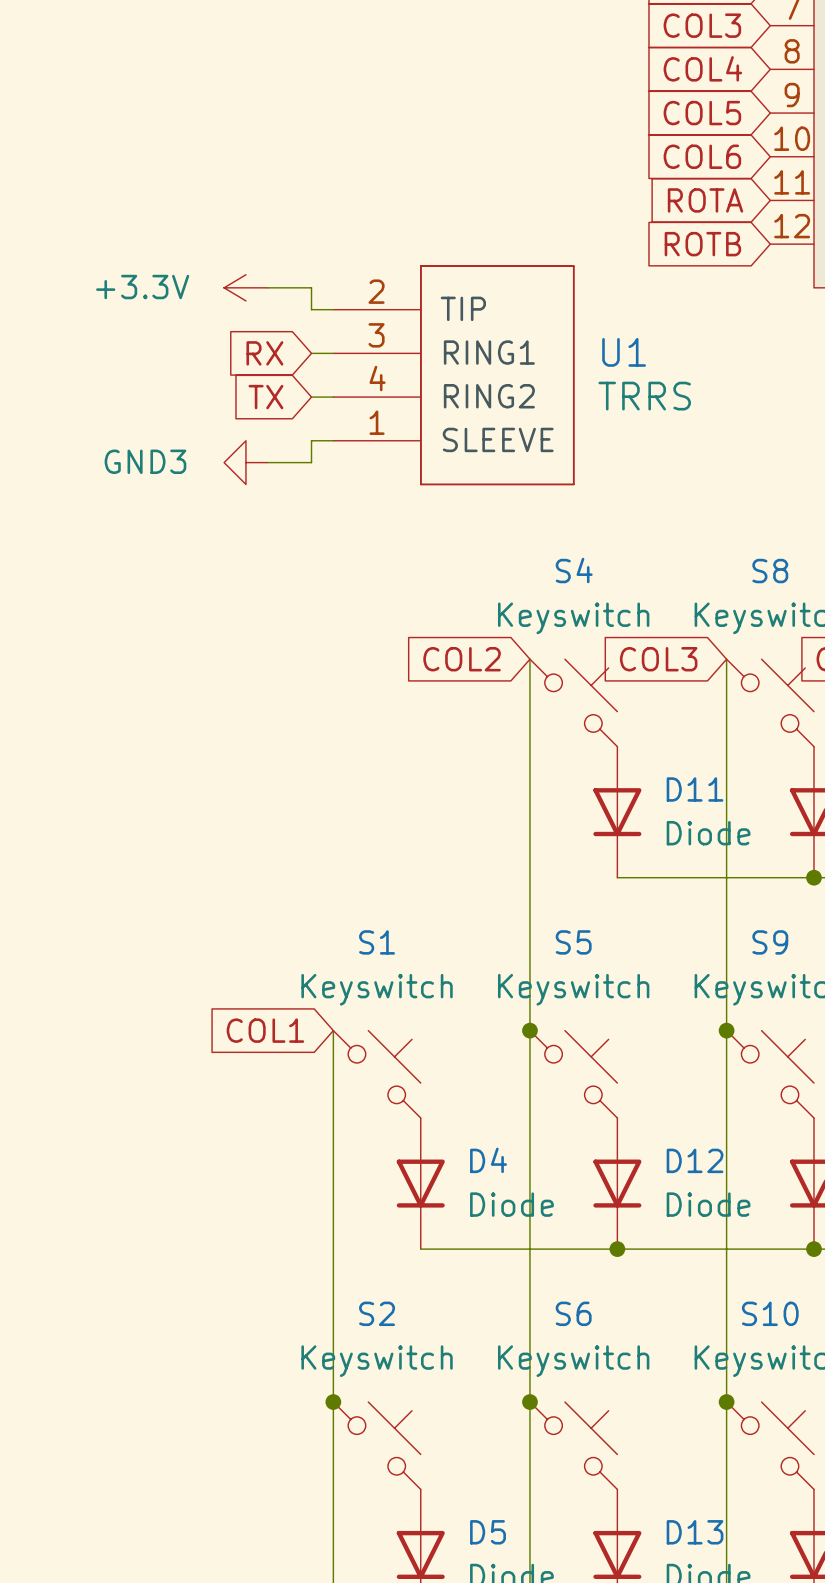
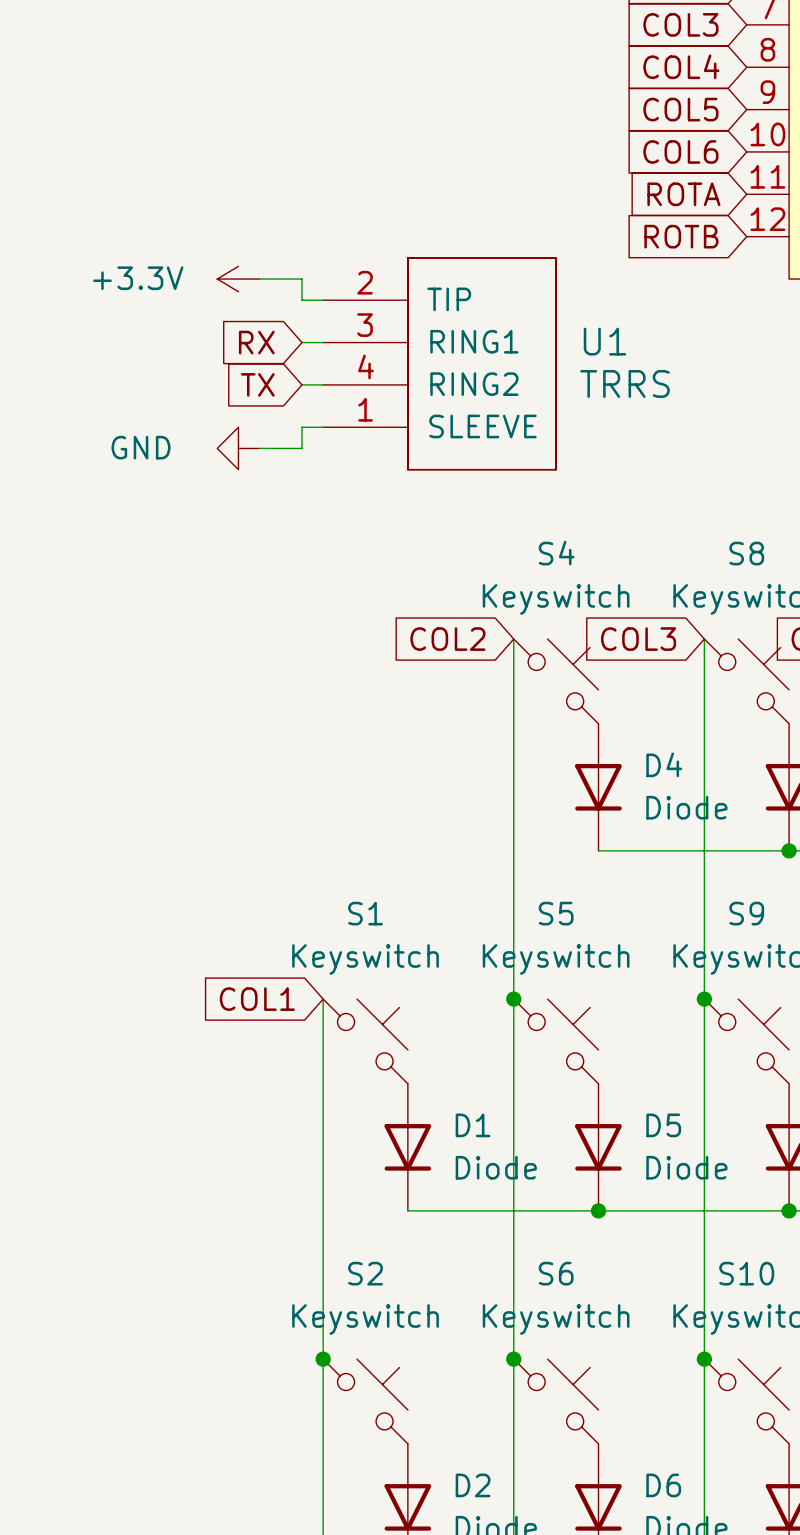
power symbol: GND3 (245, 462) -> GND (238, 448)
D11 name: D11 (695, 789) -> D4 (664, 764)
D4 name: D4 (488, 1160) -> D1 (473, 1125)
D12 name: D12 (695, 1160) -> D5 (663, 1125)
D5 name: D5 (488, 1532) -> D2 (473, 1485)
D13 name: D13 (695, 1532) -> D6 (663, 1485)

